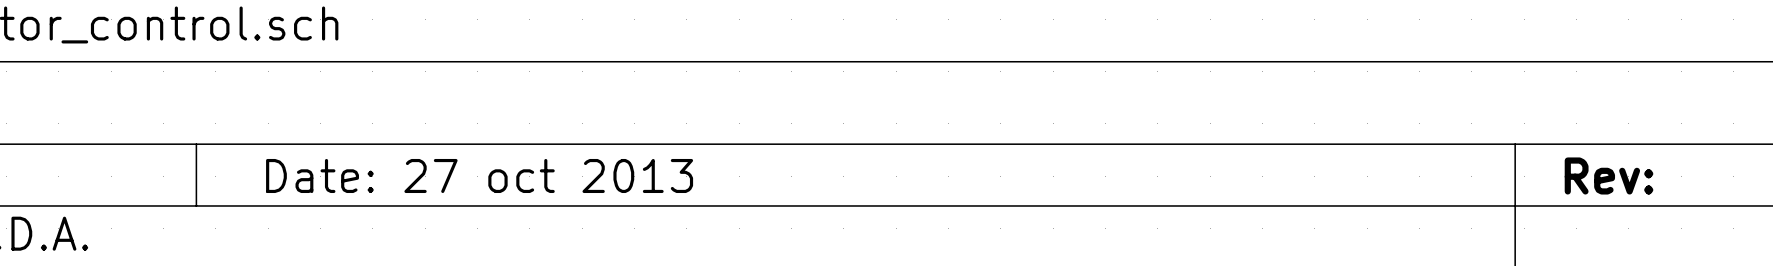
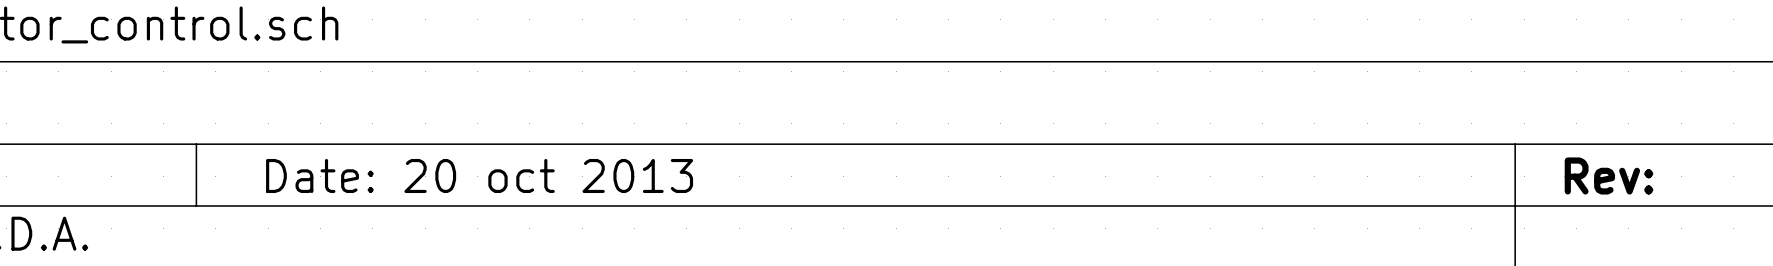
title block: Date: 27 oct 2013 (479, 175) -> Date: 20 oct 2013 (479, 175)

